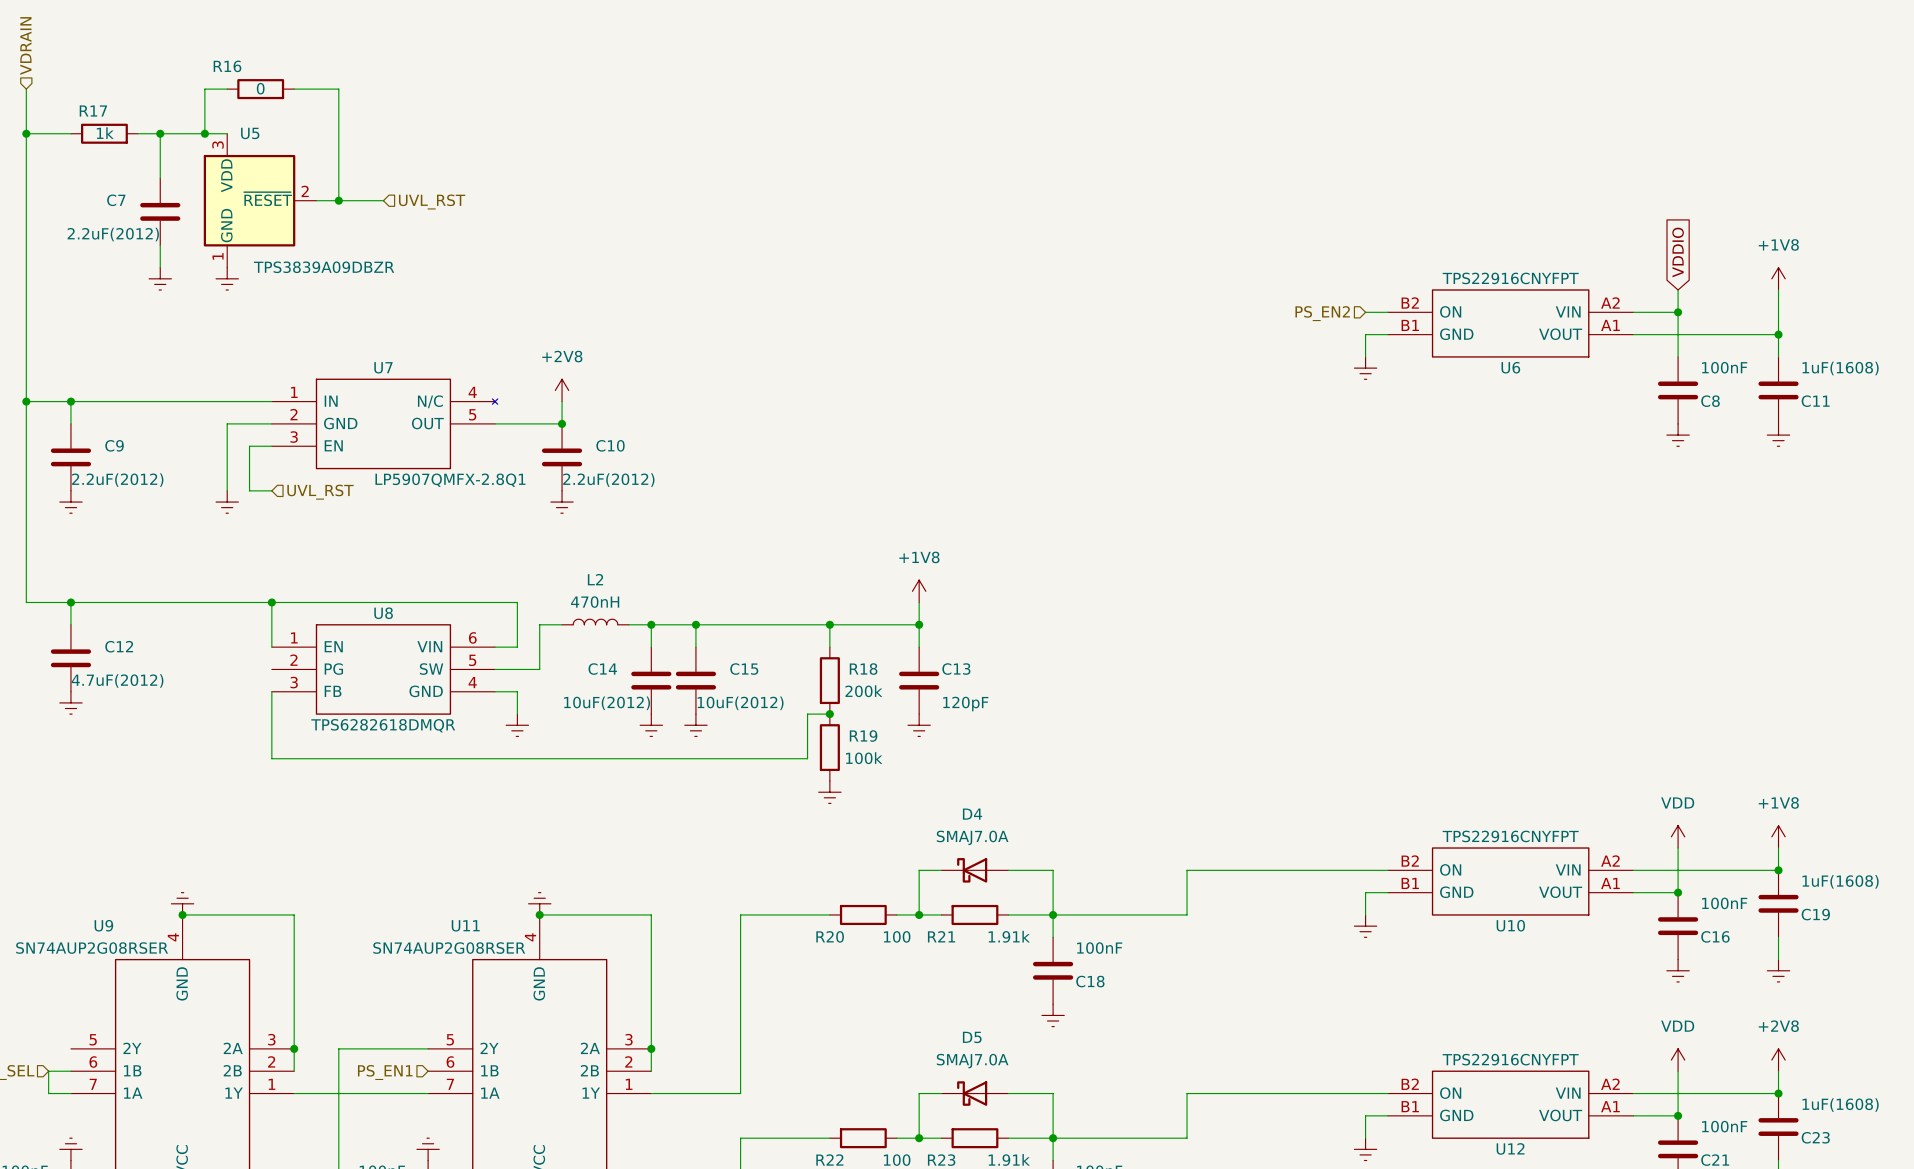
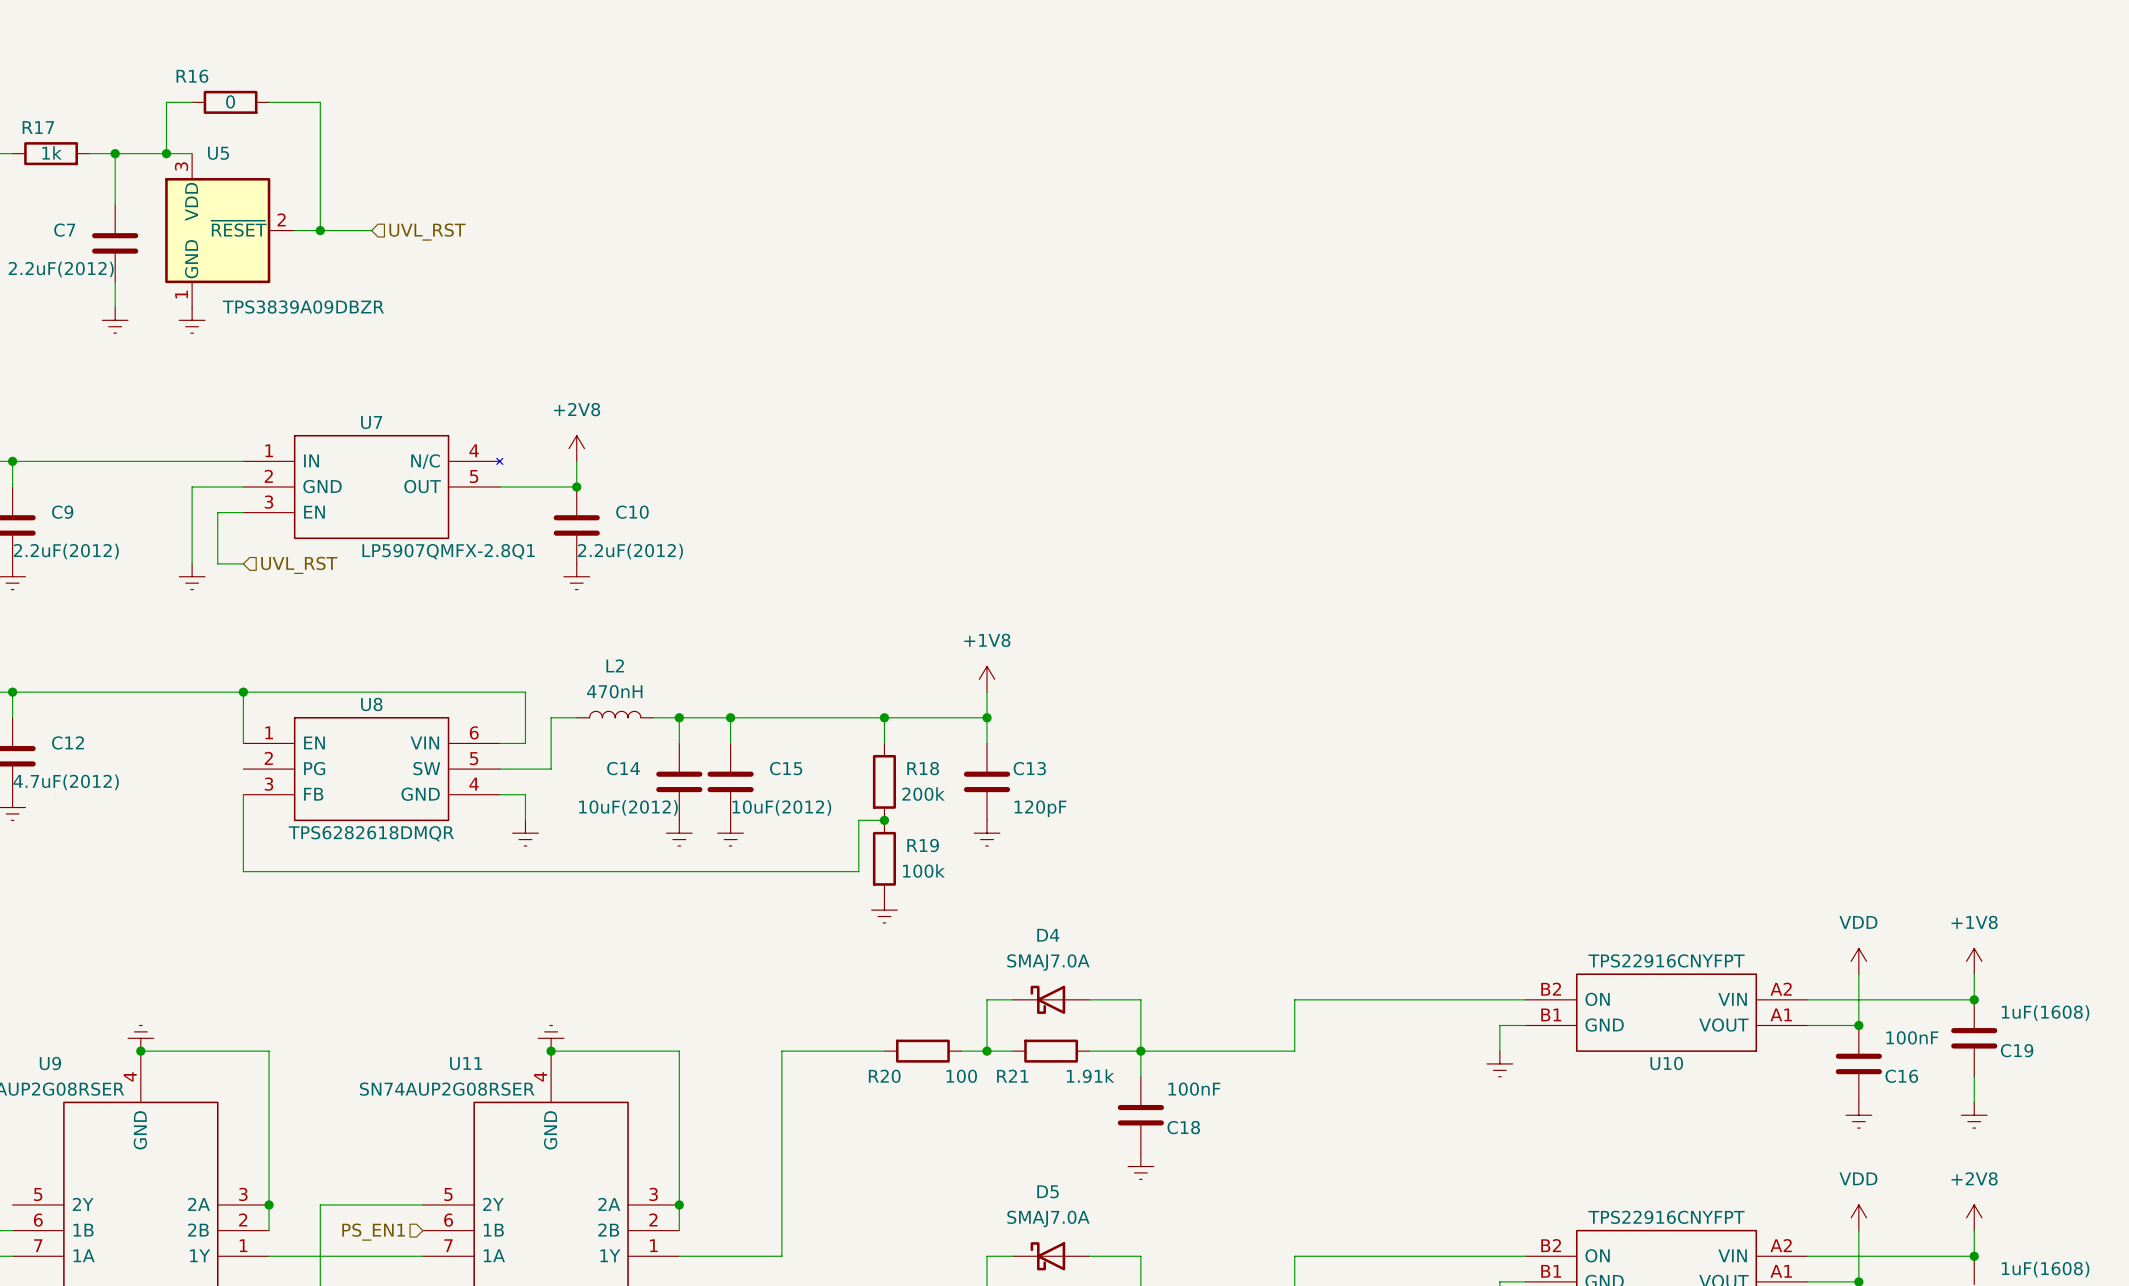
global label: VDDIO (1678, 252) -> none
power symbol: +1V8 (1778, 278) -> none
wire: (1678, 289) (1678, 356) -> none
wire: (1778, 289) (1778, 356) -> none
wire: (1365, 312) (1387, 312) -> none
wire: (1633, 312) (1678, 312) -> none
junction: (1678, 312) -> none
hierarchical label: PS_EN2 (1322, 313) -> none
U6: TPS22916CNYFPT (1510, 323) -> none
wire: (1387, 334) (1365, 334) (1365, 356) -> none
wire: (1633, 334) (1778, 334) -> none
junction: (1778, 334) -> none
power symbol: (1365, 368) -> none
C8: 100nF (1678, 390) -> none
C11: 1uF(1608) (1778, 390) -> none
power symbol: (1678, 435) -> none
power symbol: (1778, 435) -> none

